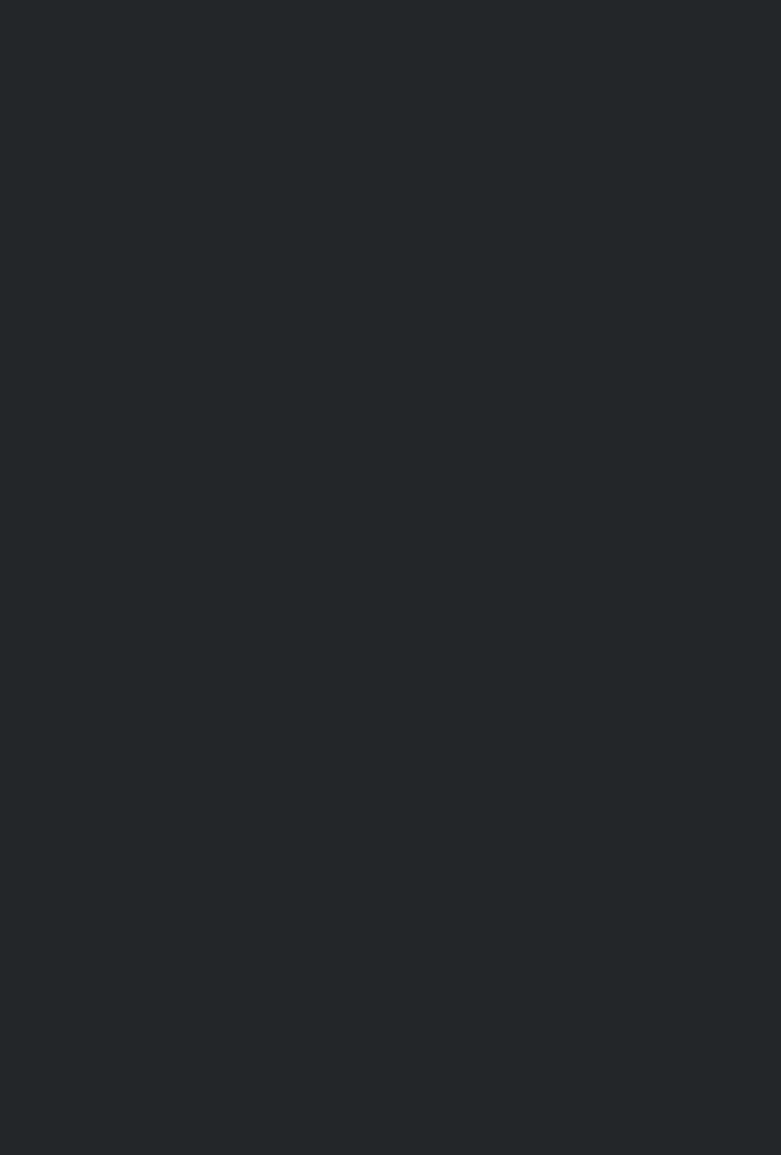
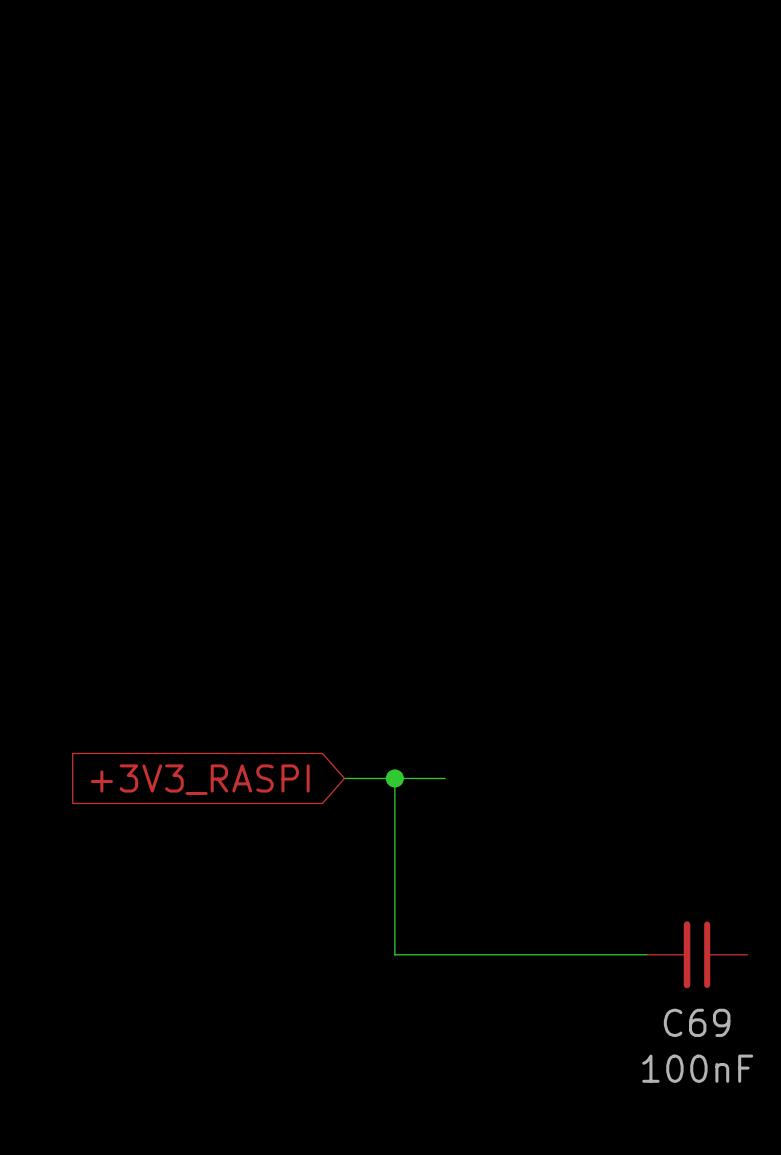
wire: none -> (344, 778) (445, 778)
wire: none -> (394, 778) (394, 954) (646, 954)
junction: none -> (394, 778)
global label: none -> +3V3_RASPI (200, 779)
C69: none -> 100nF (697, 954)

